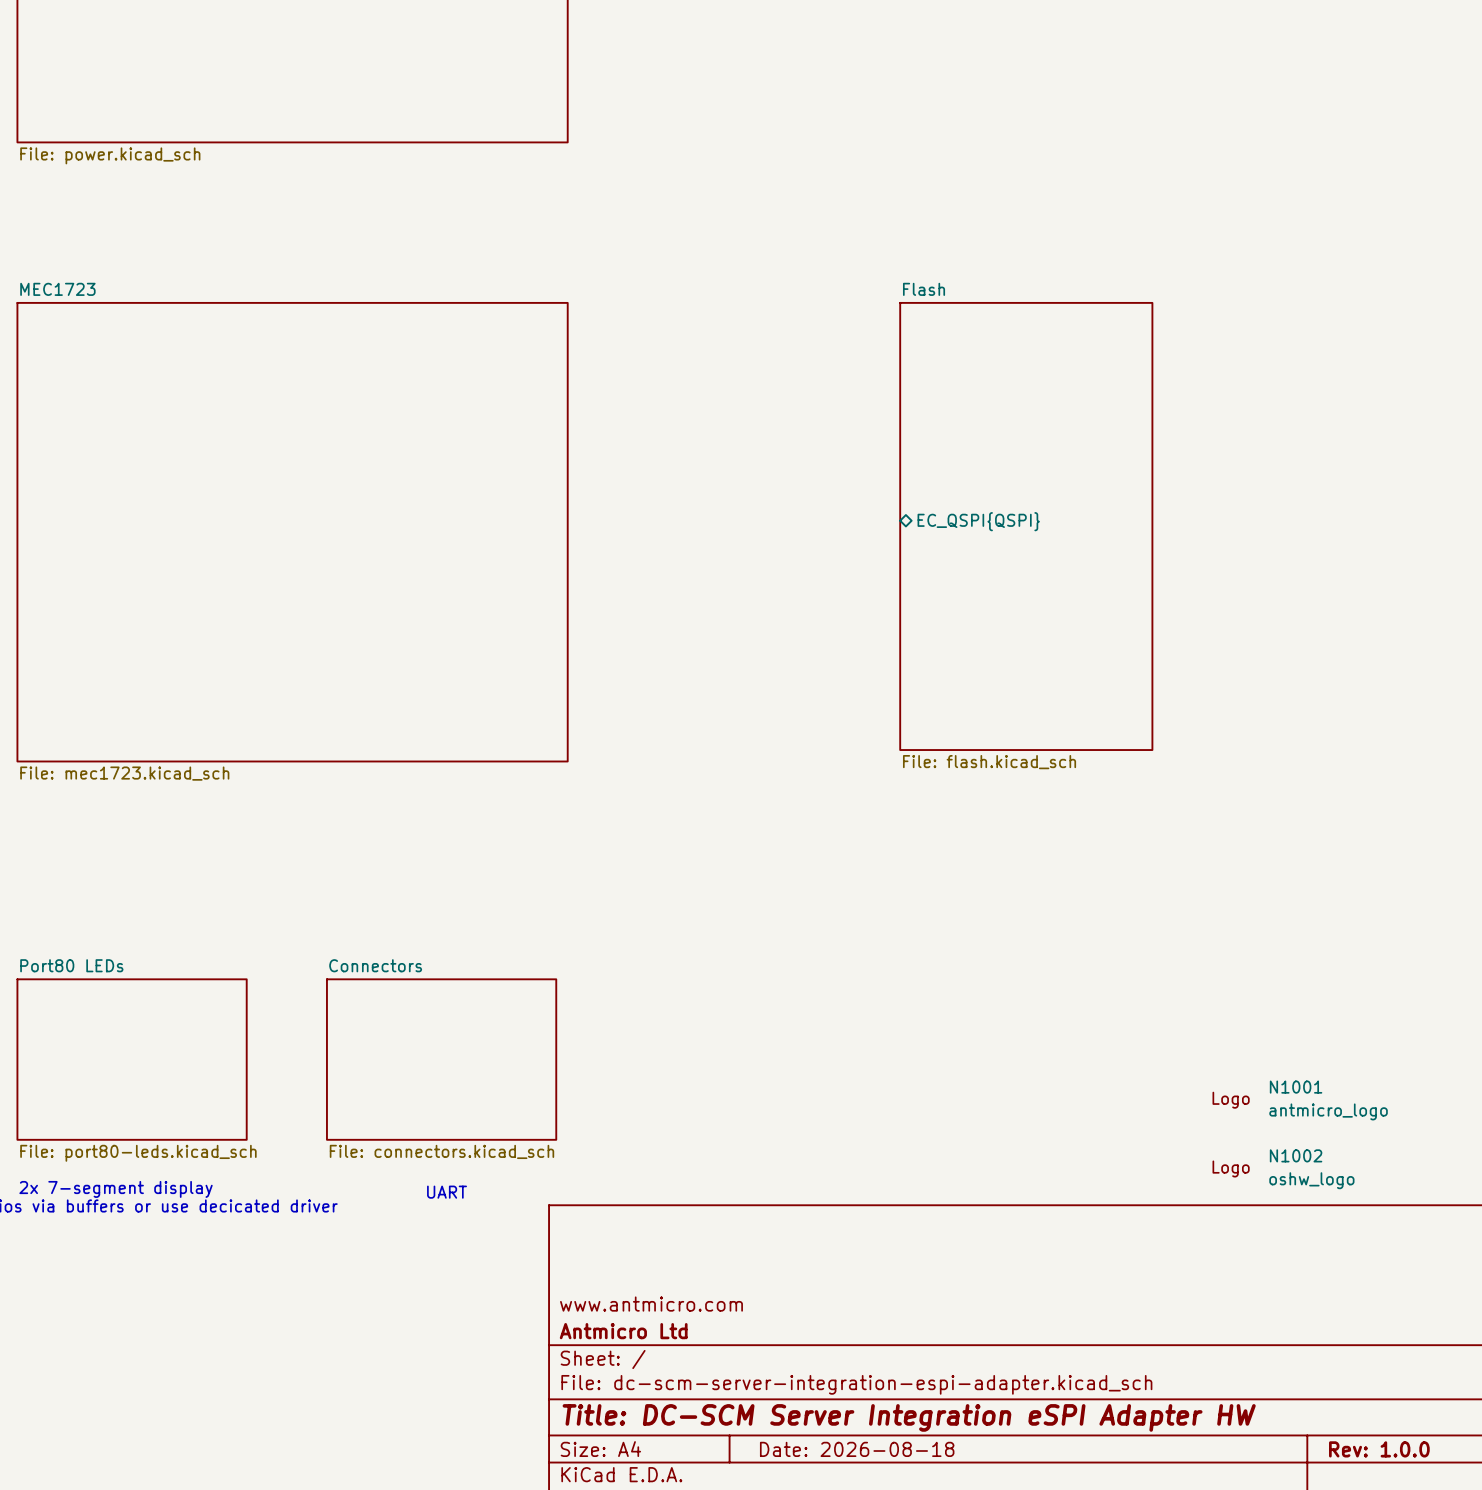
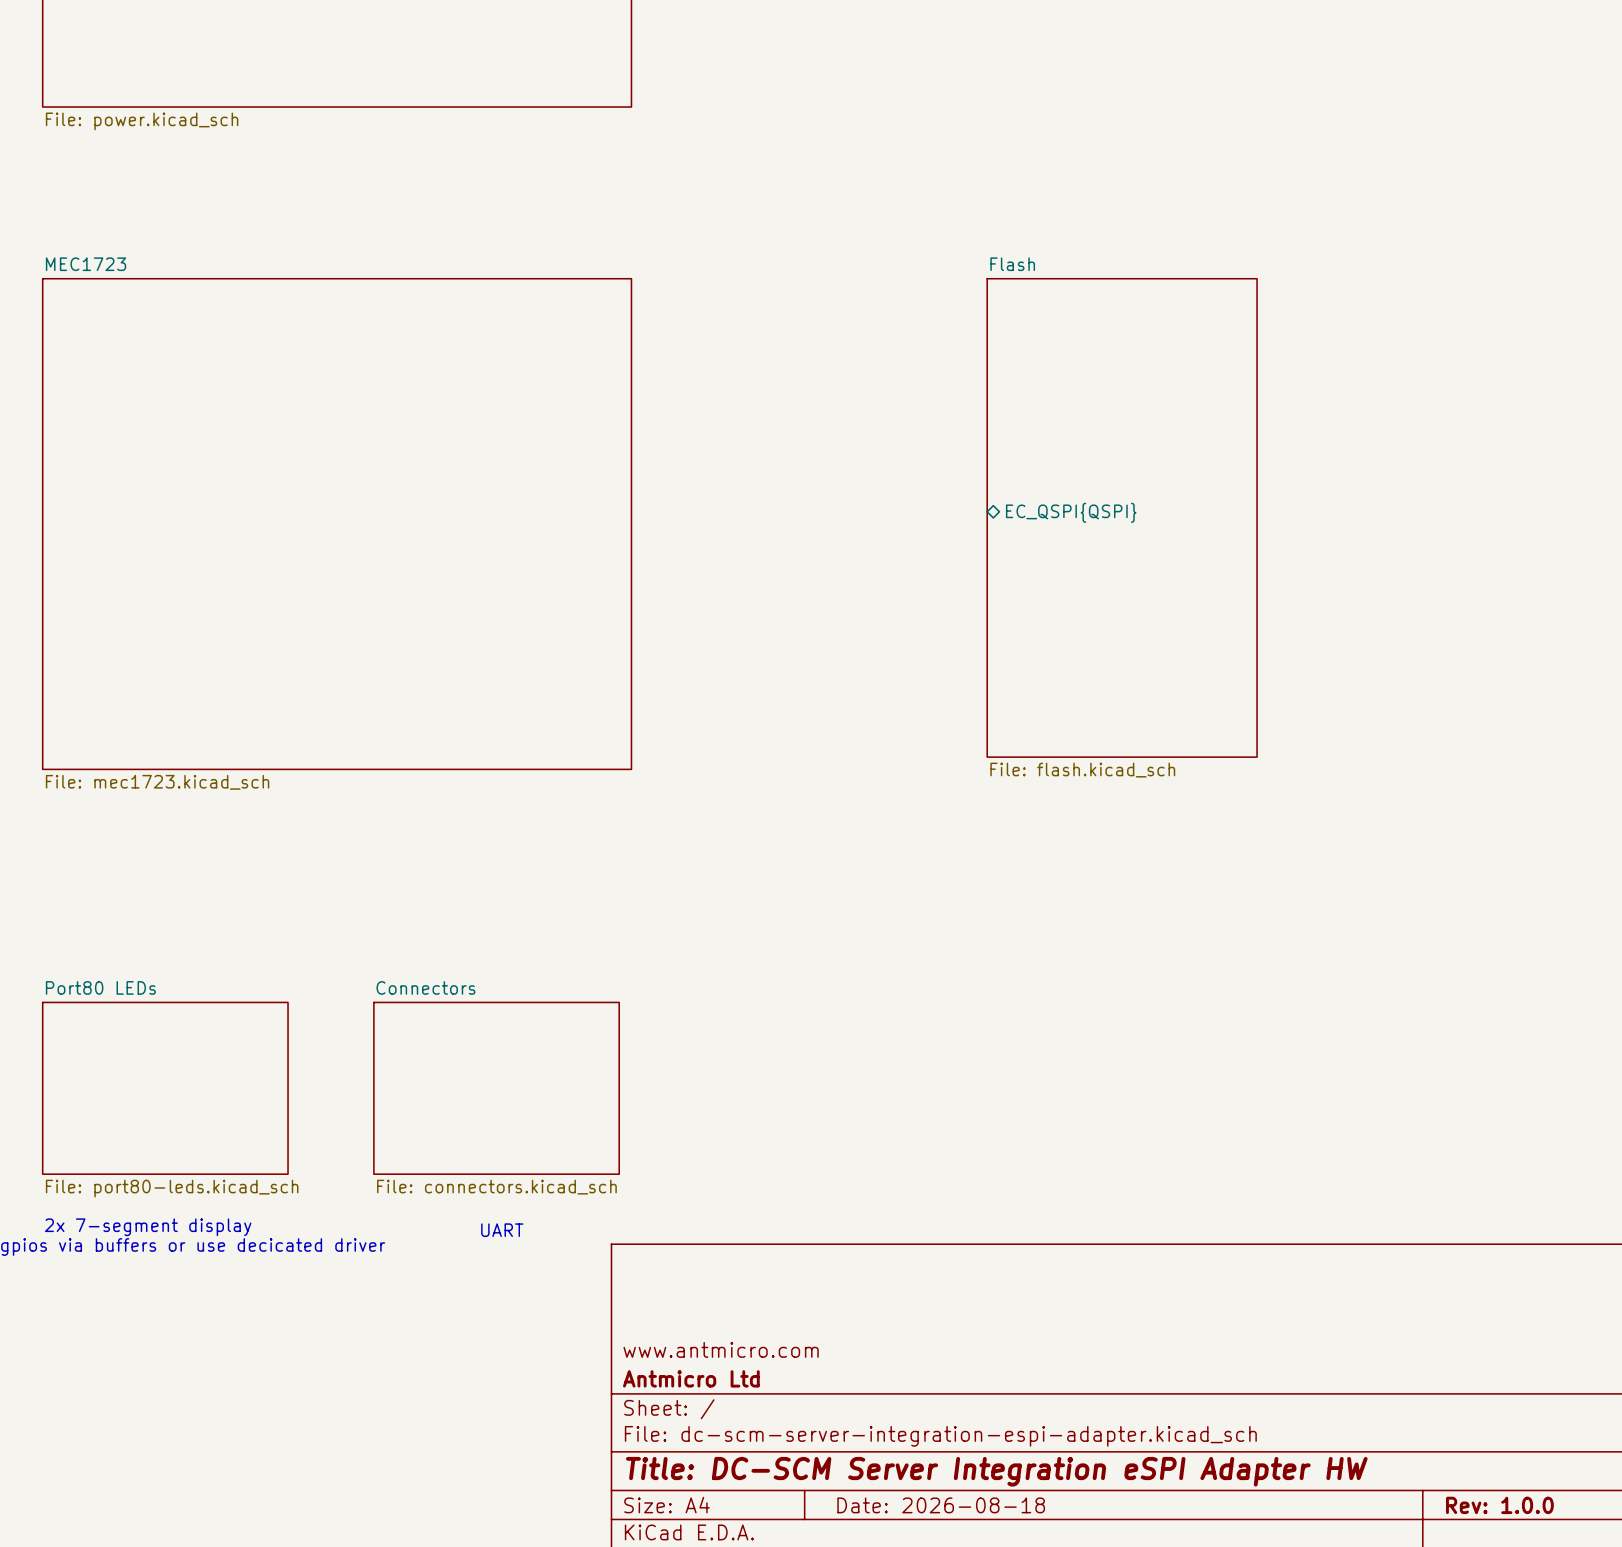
N1001: antmicro_logo (1300, 1100) -> none
N1002: oshw_logo (1283, 1169) -> none

